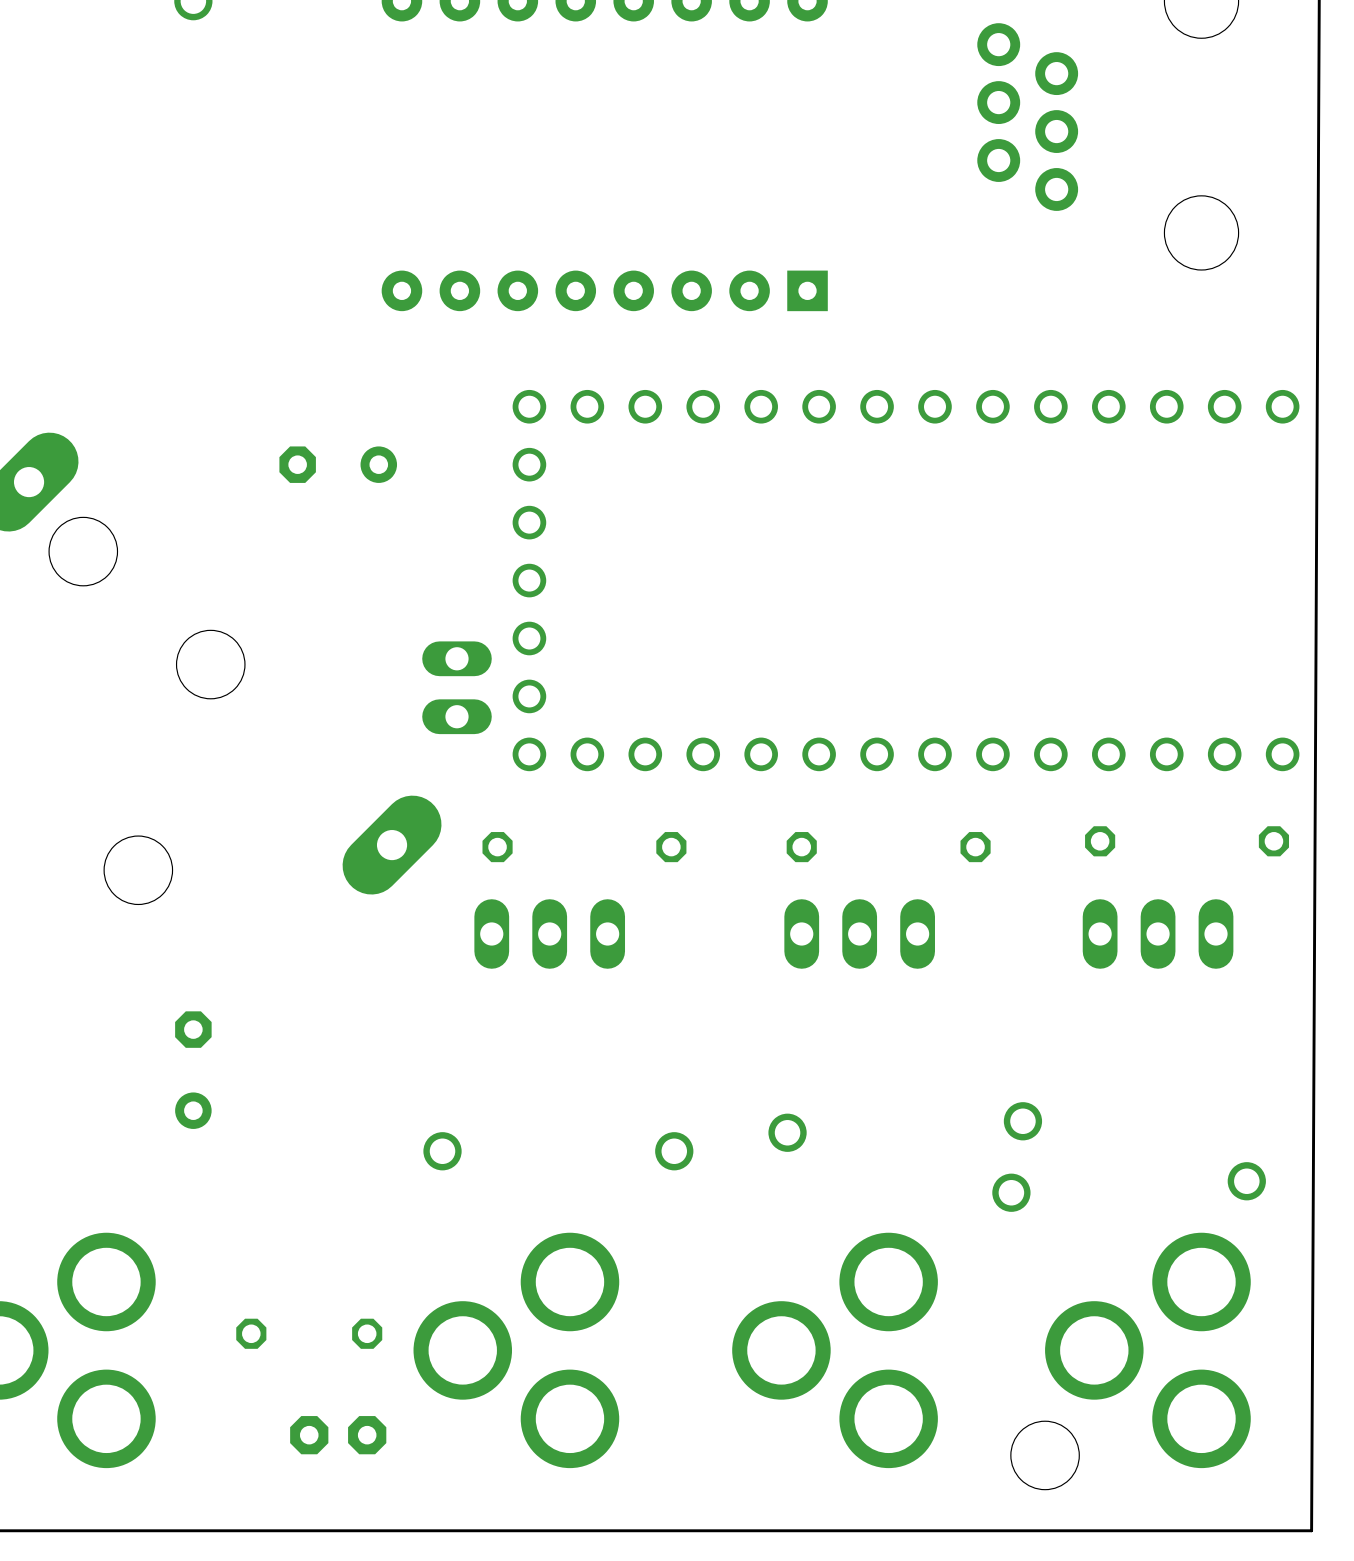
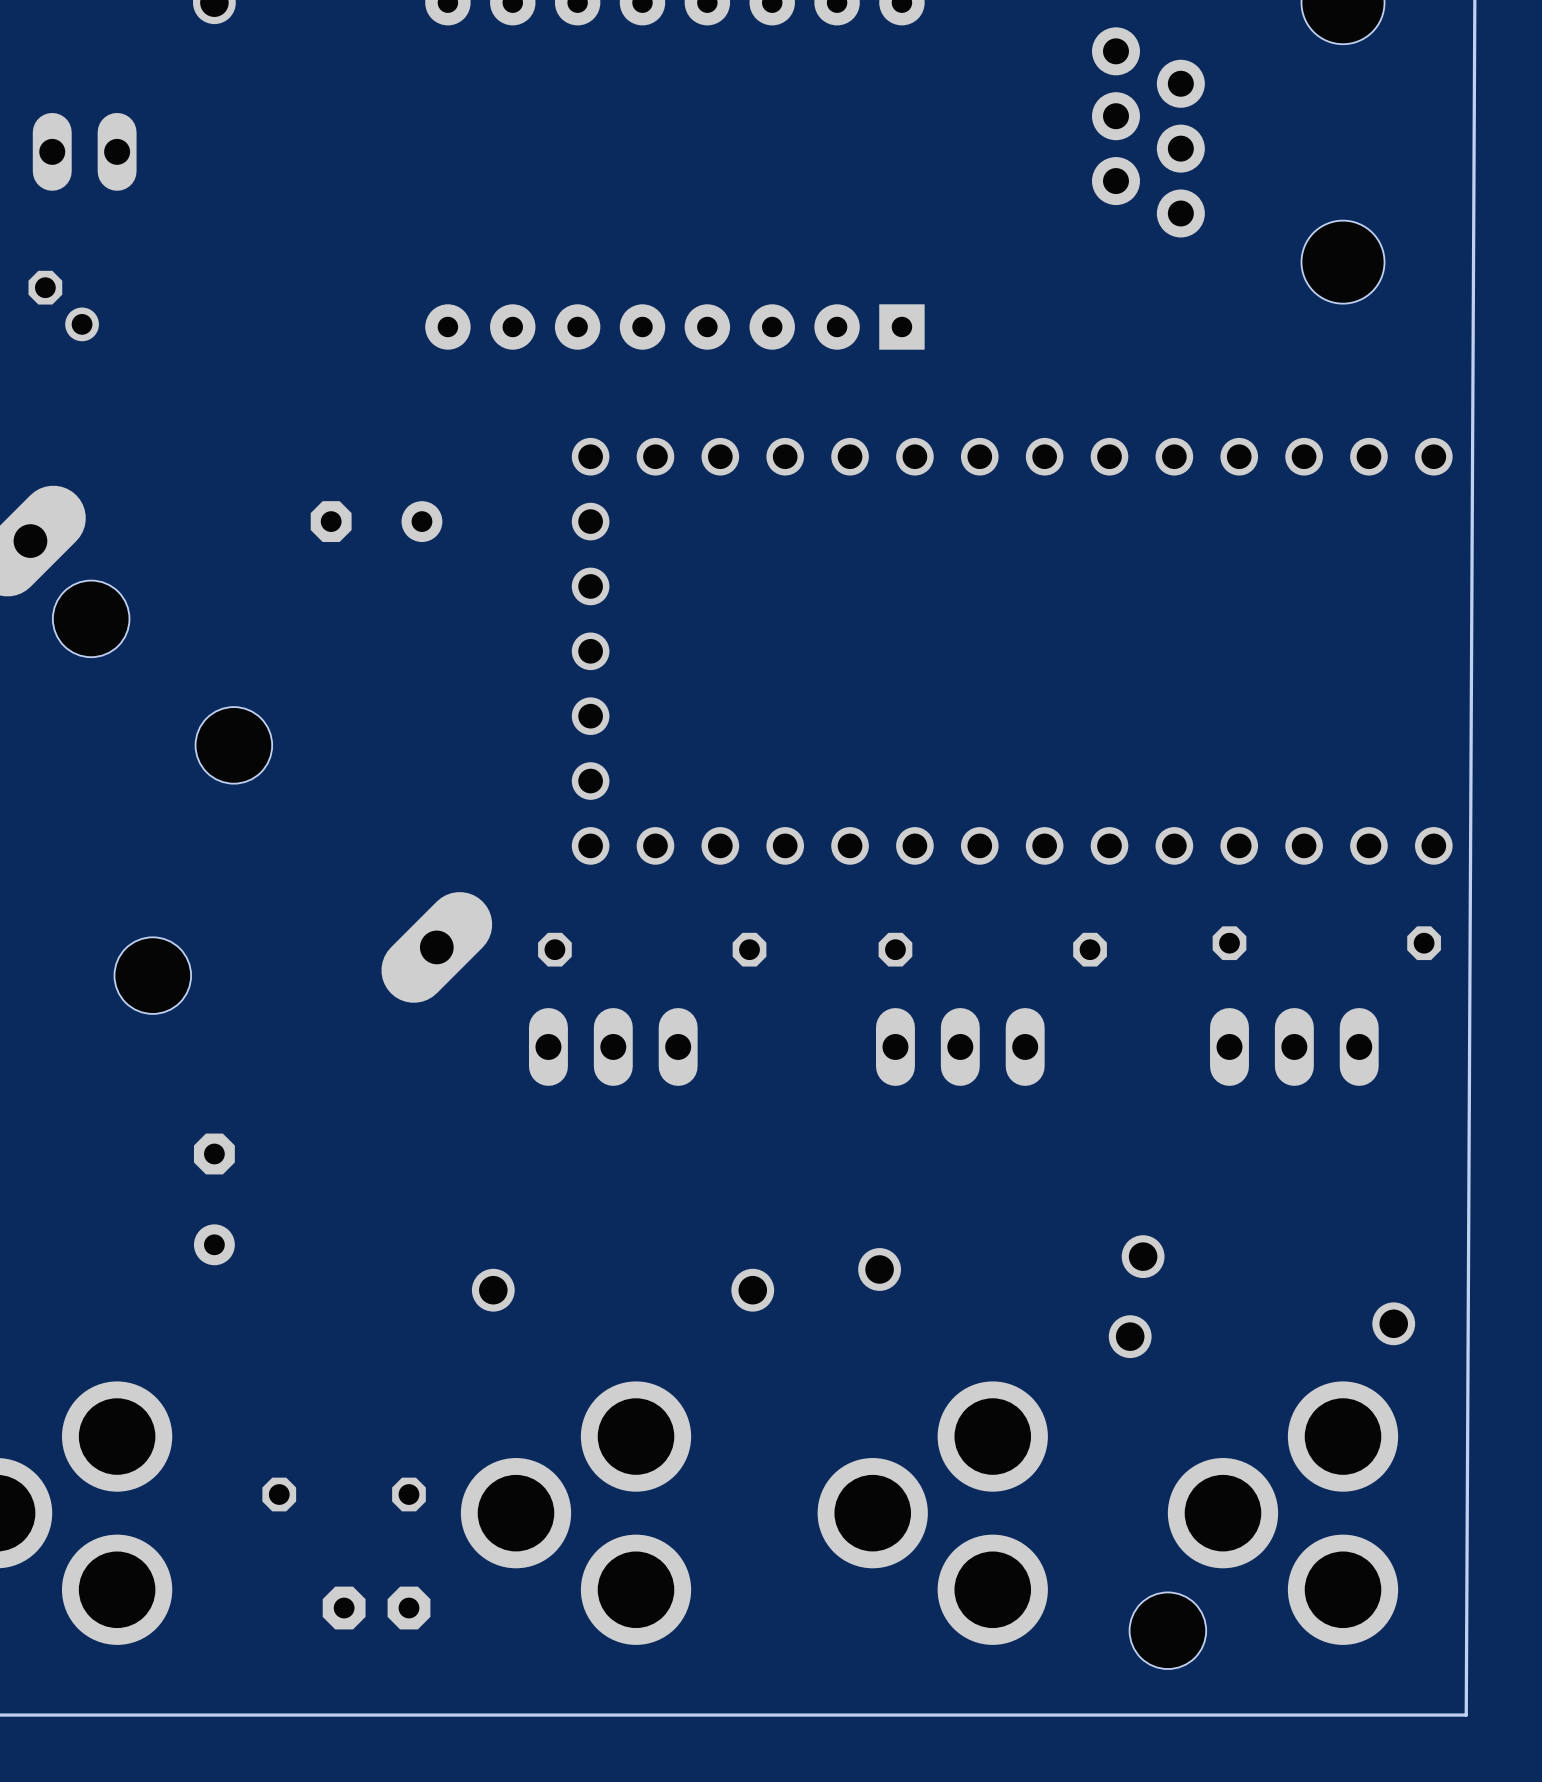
part: none -> (84, 151)
part: none -> (63, 306)
part: (456, 687) -> none

